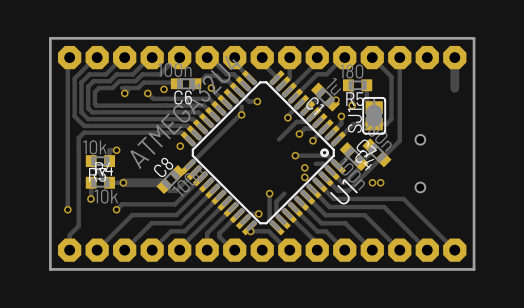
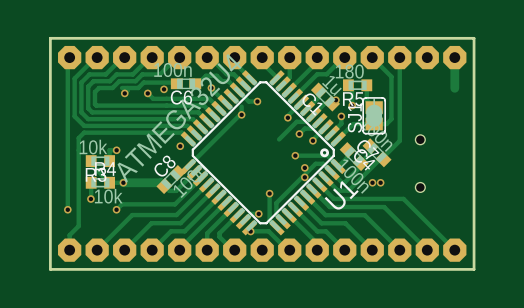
track: (284, 193) (276, 203) -> (315, 163) (276, 203)

